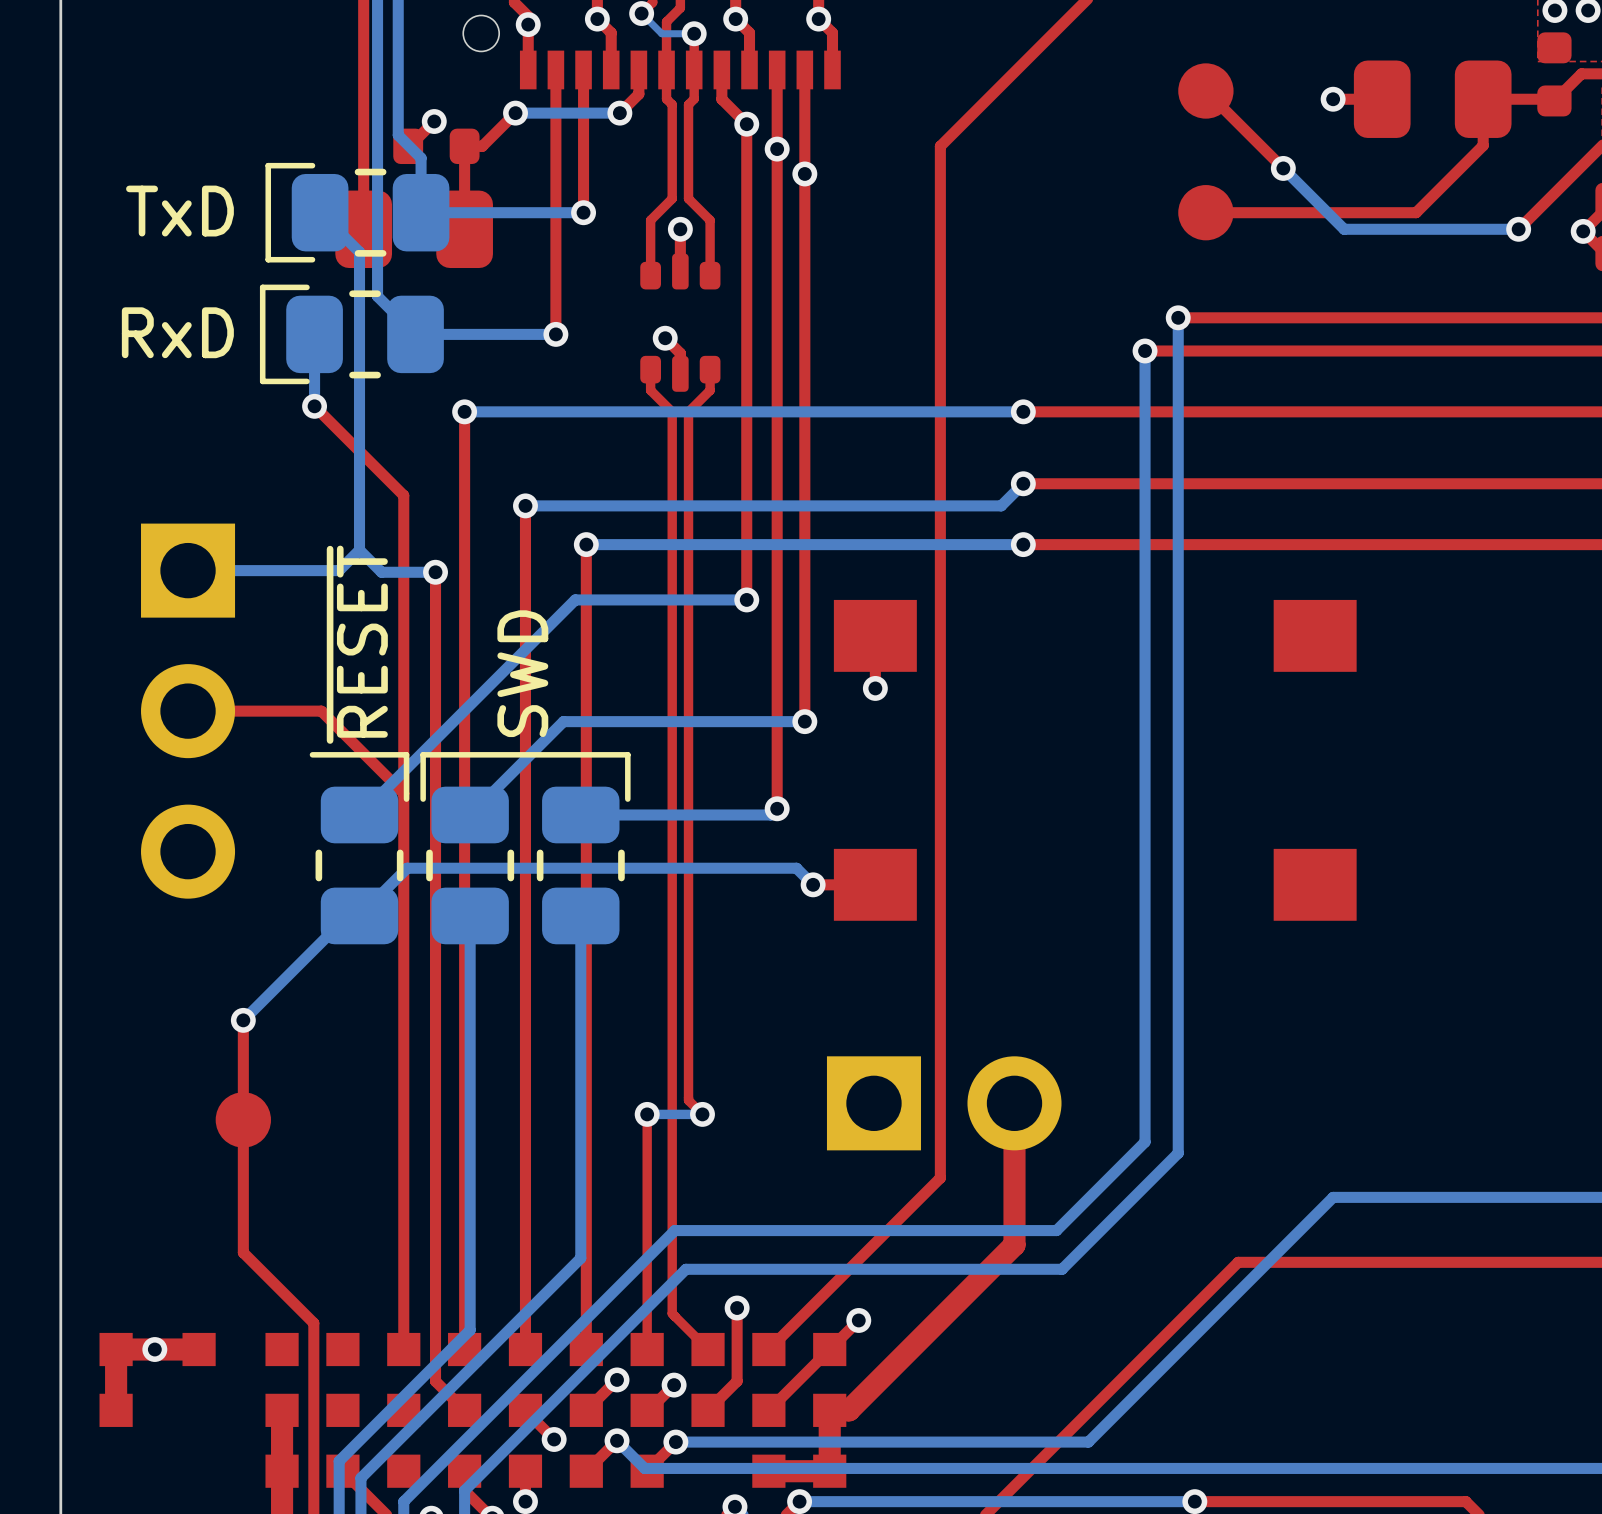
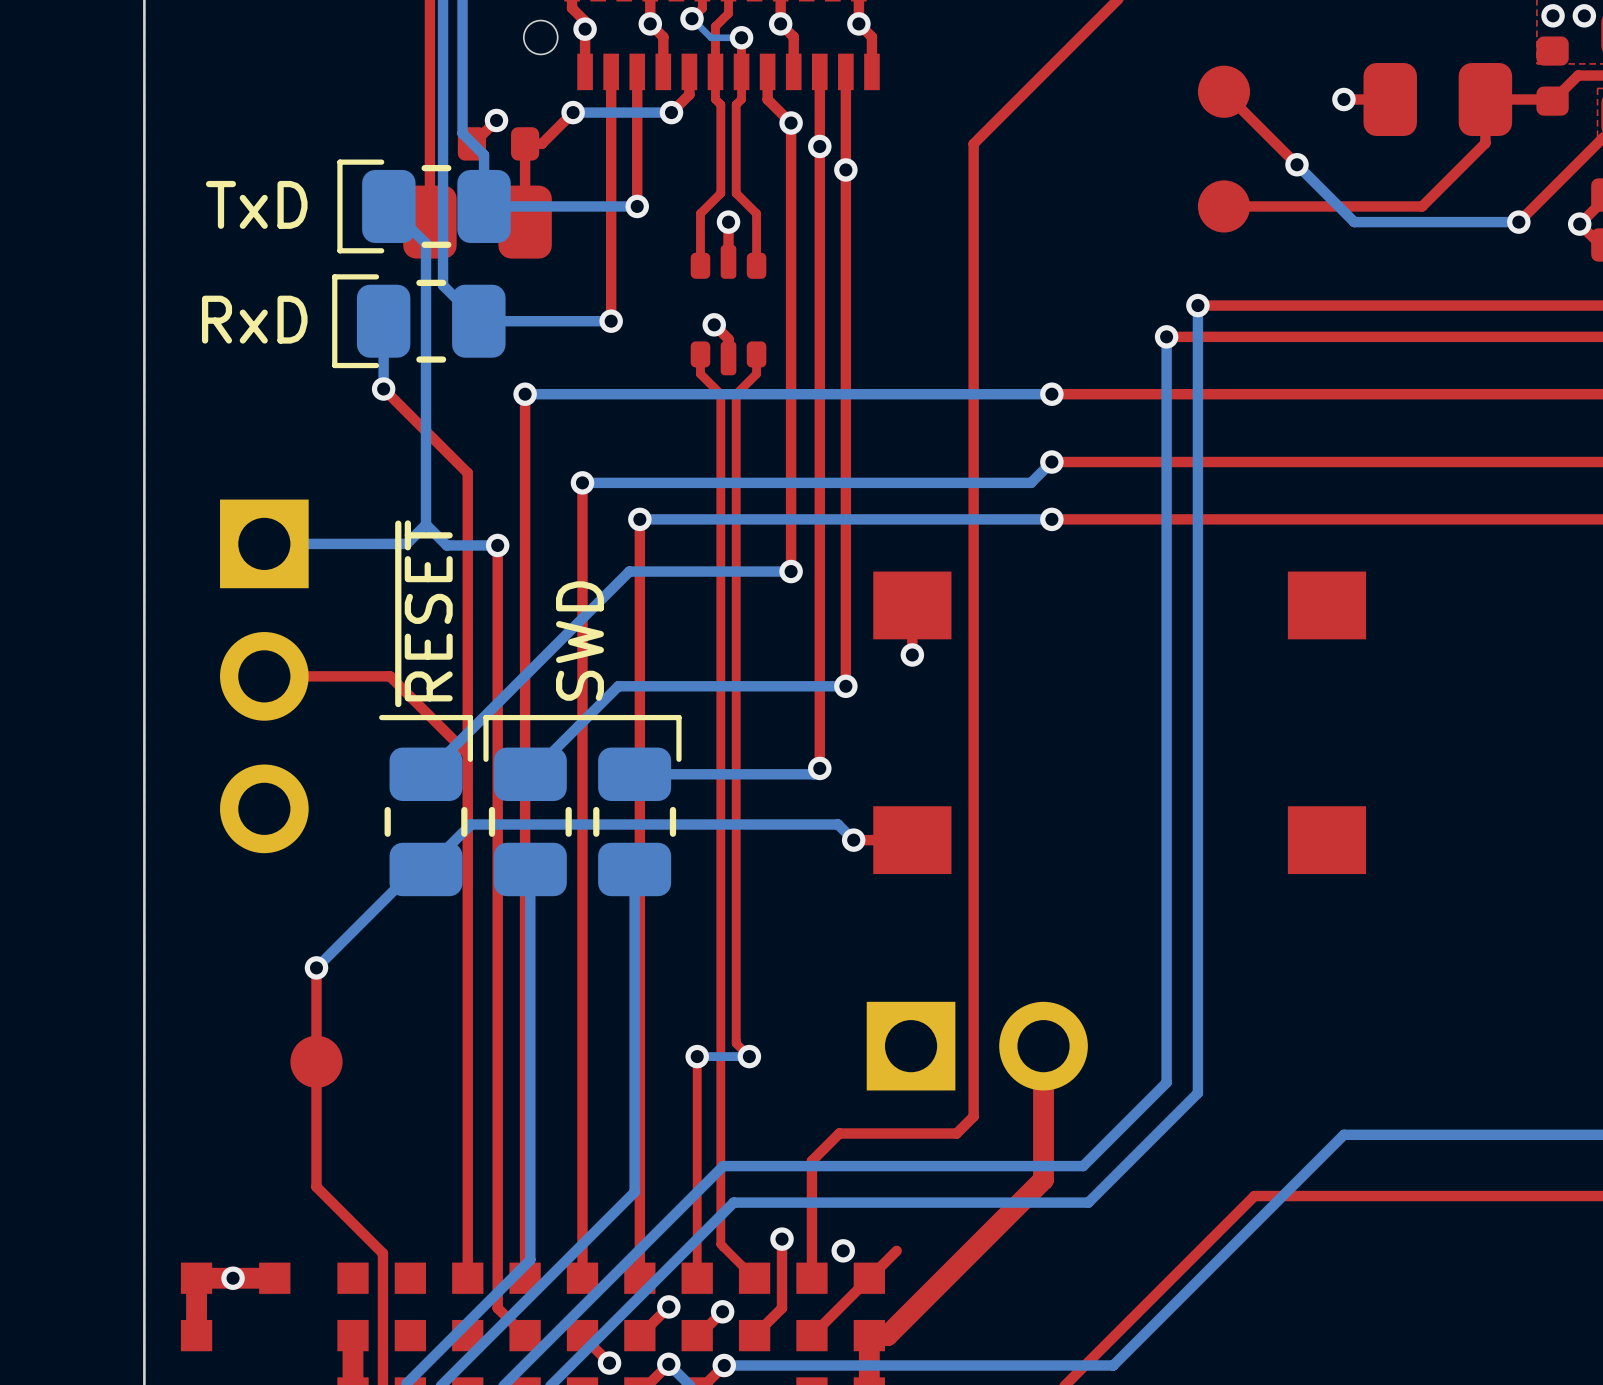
top track: (922, 1196) (768, 1349) -> (956, 1133) (839, 1133) (811, 1160) (811, 1278)
via position: (858, 1320) -> (843, 1250)

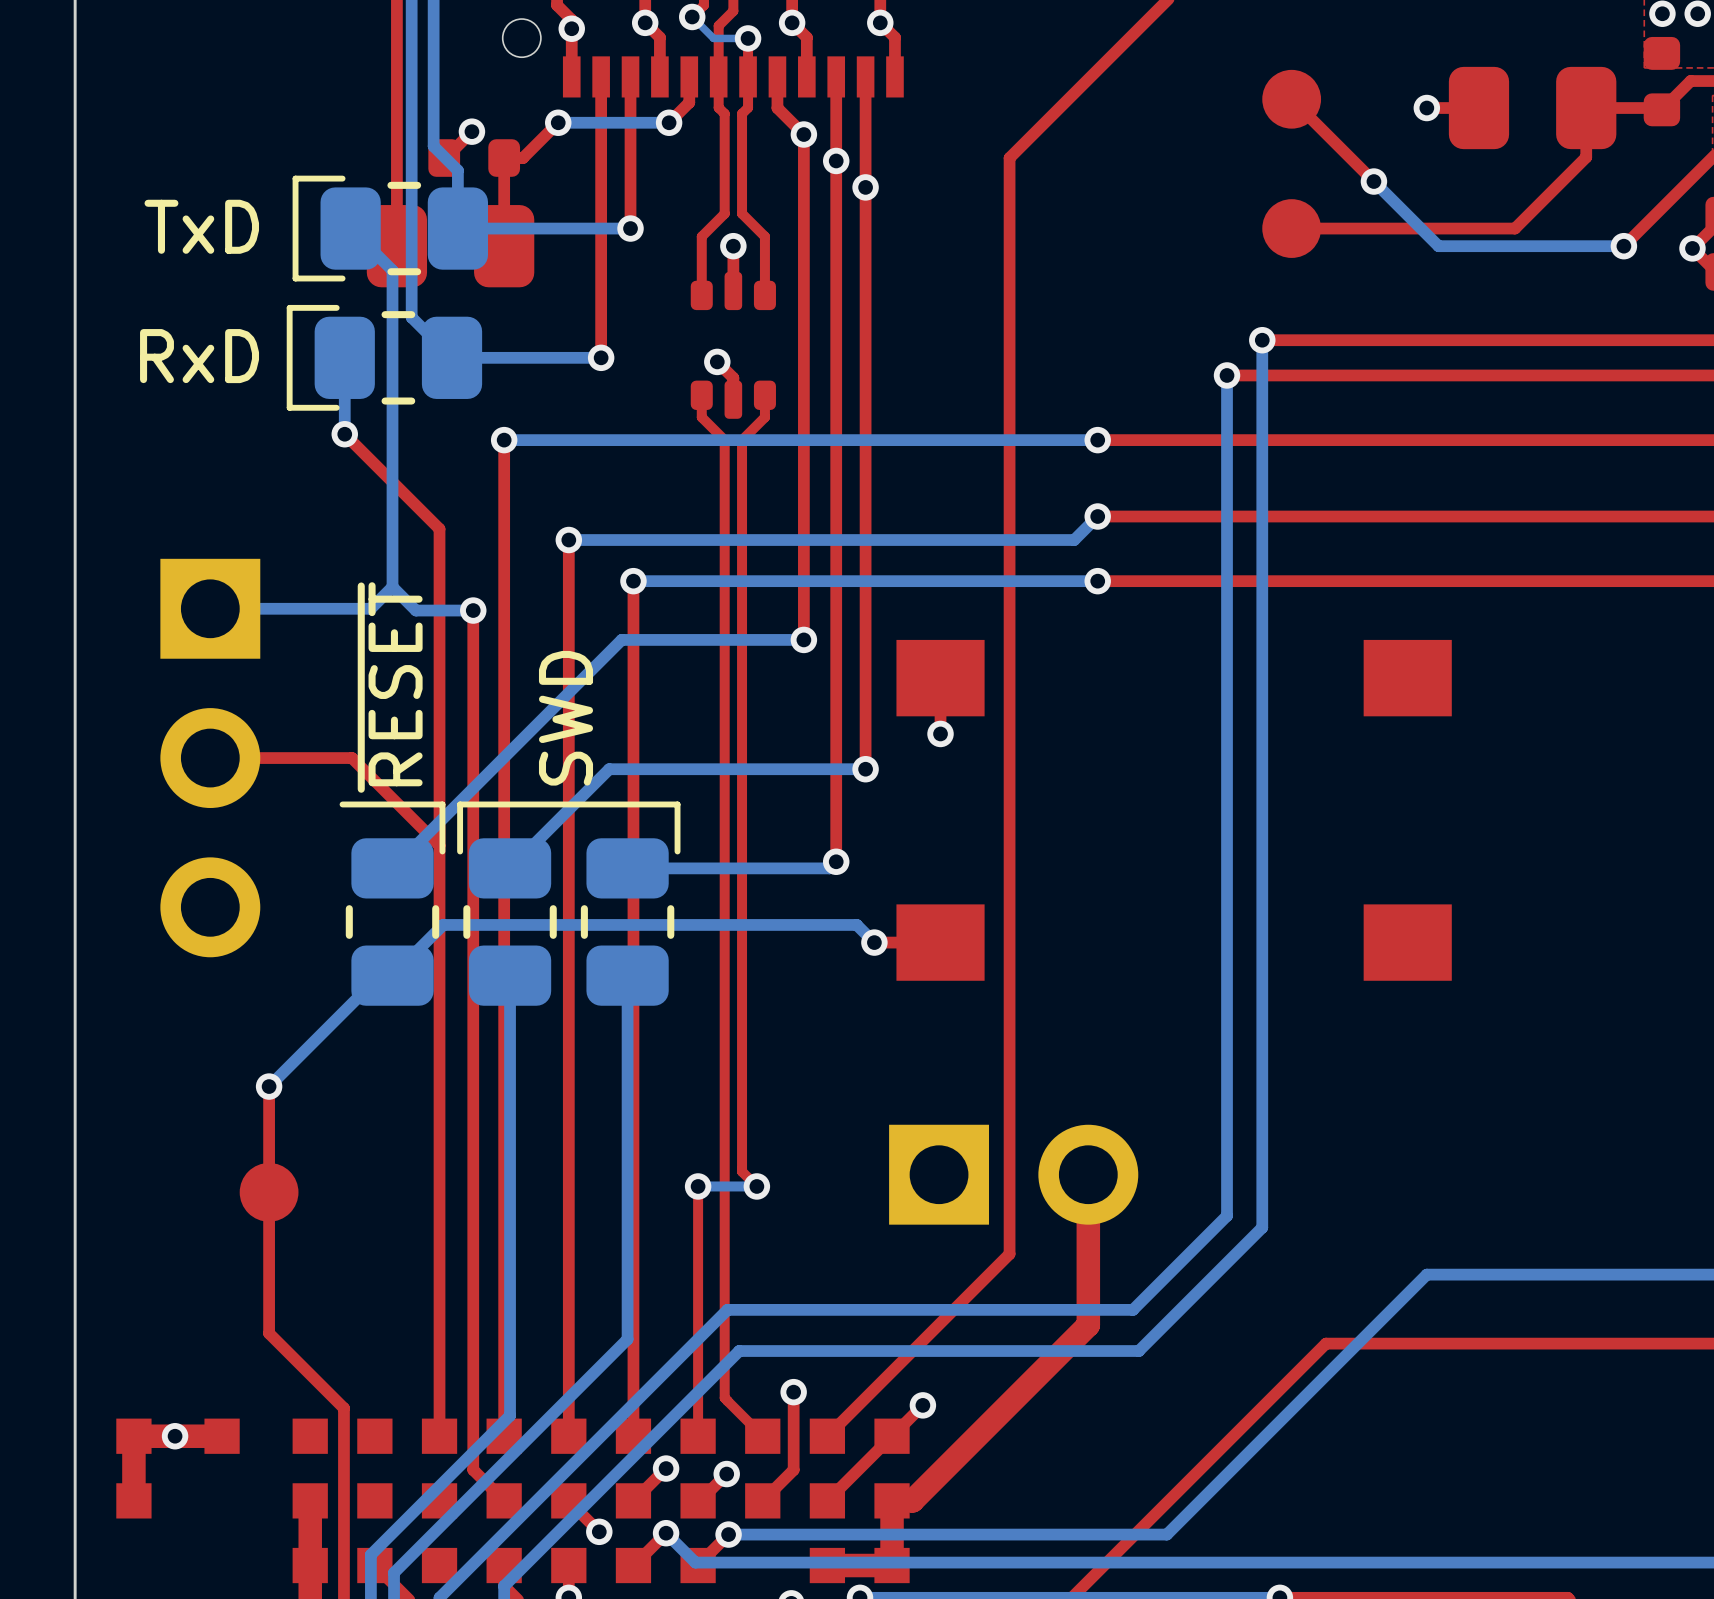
top track: (956, 1133) (839, 1133) (811, 1160) (811, 1278) -> (990, 1273) (827, 1436)
via position: (843, 1250) -> (922, 1405)

